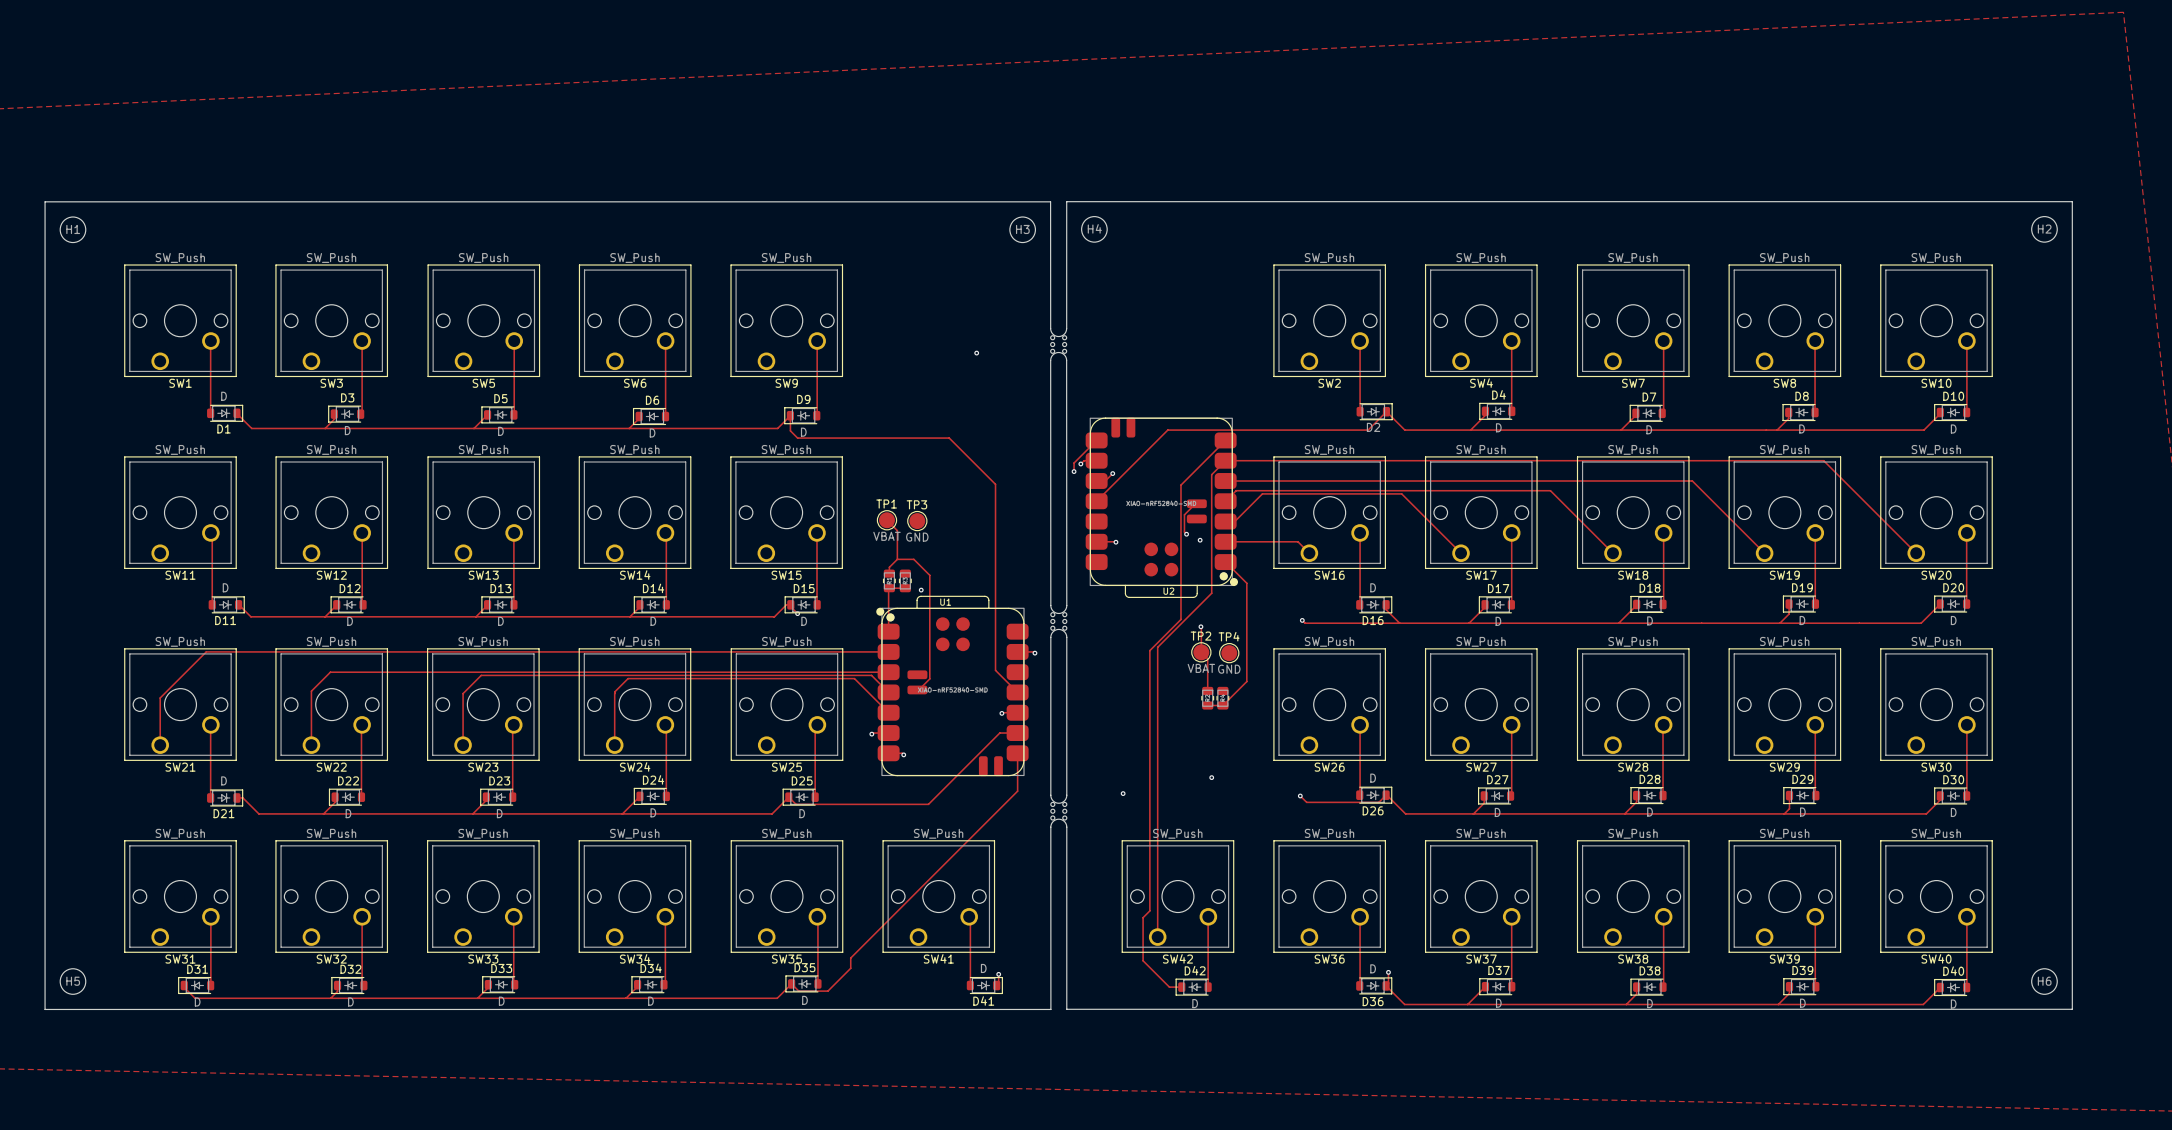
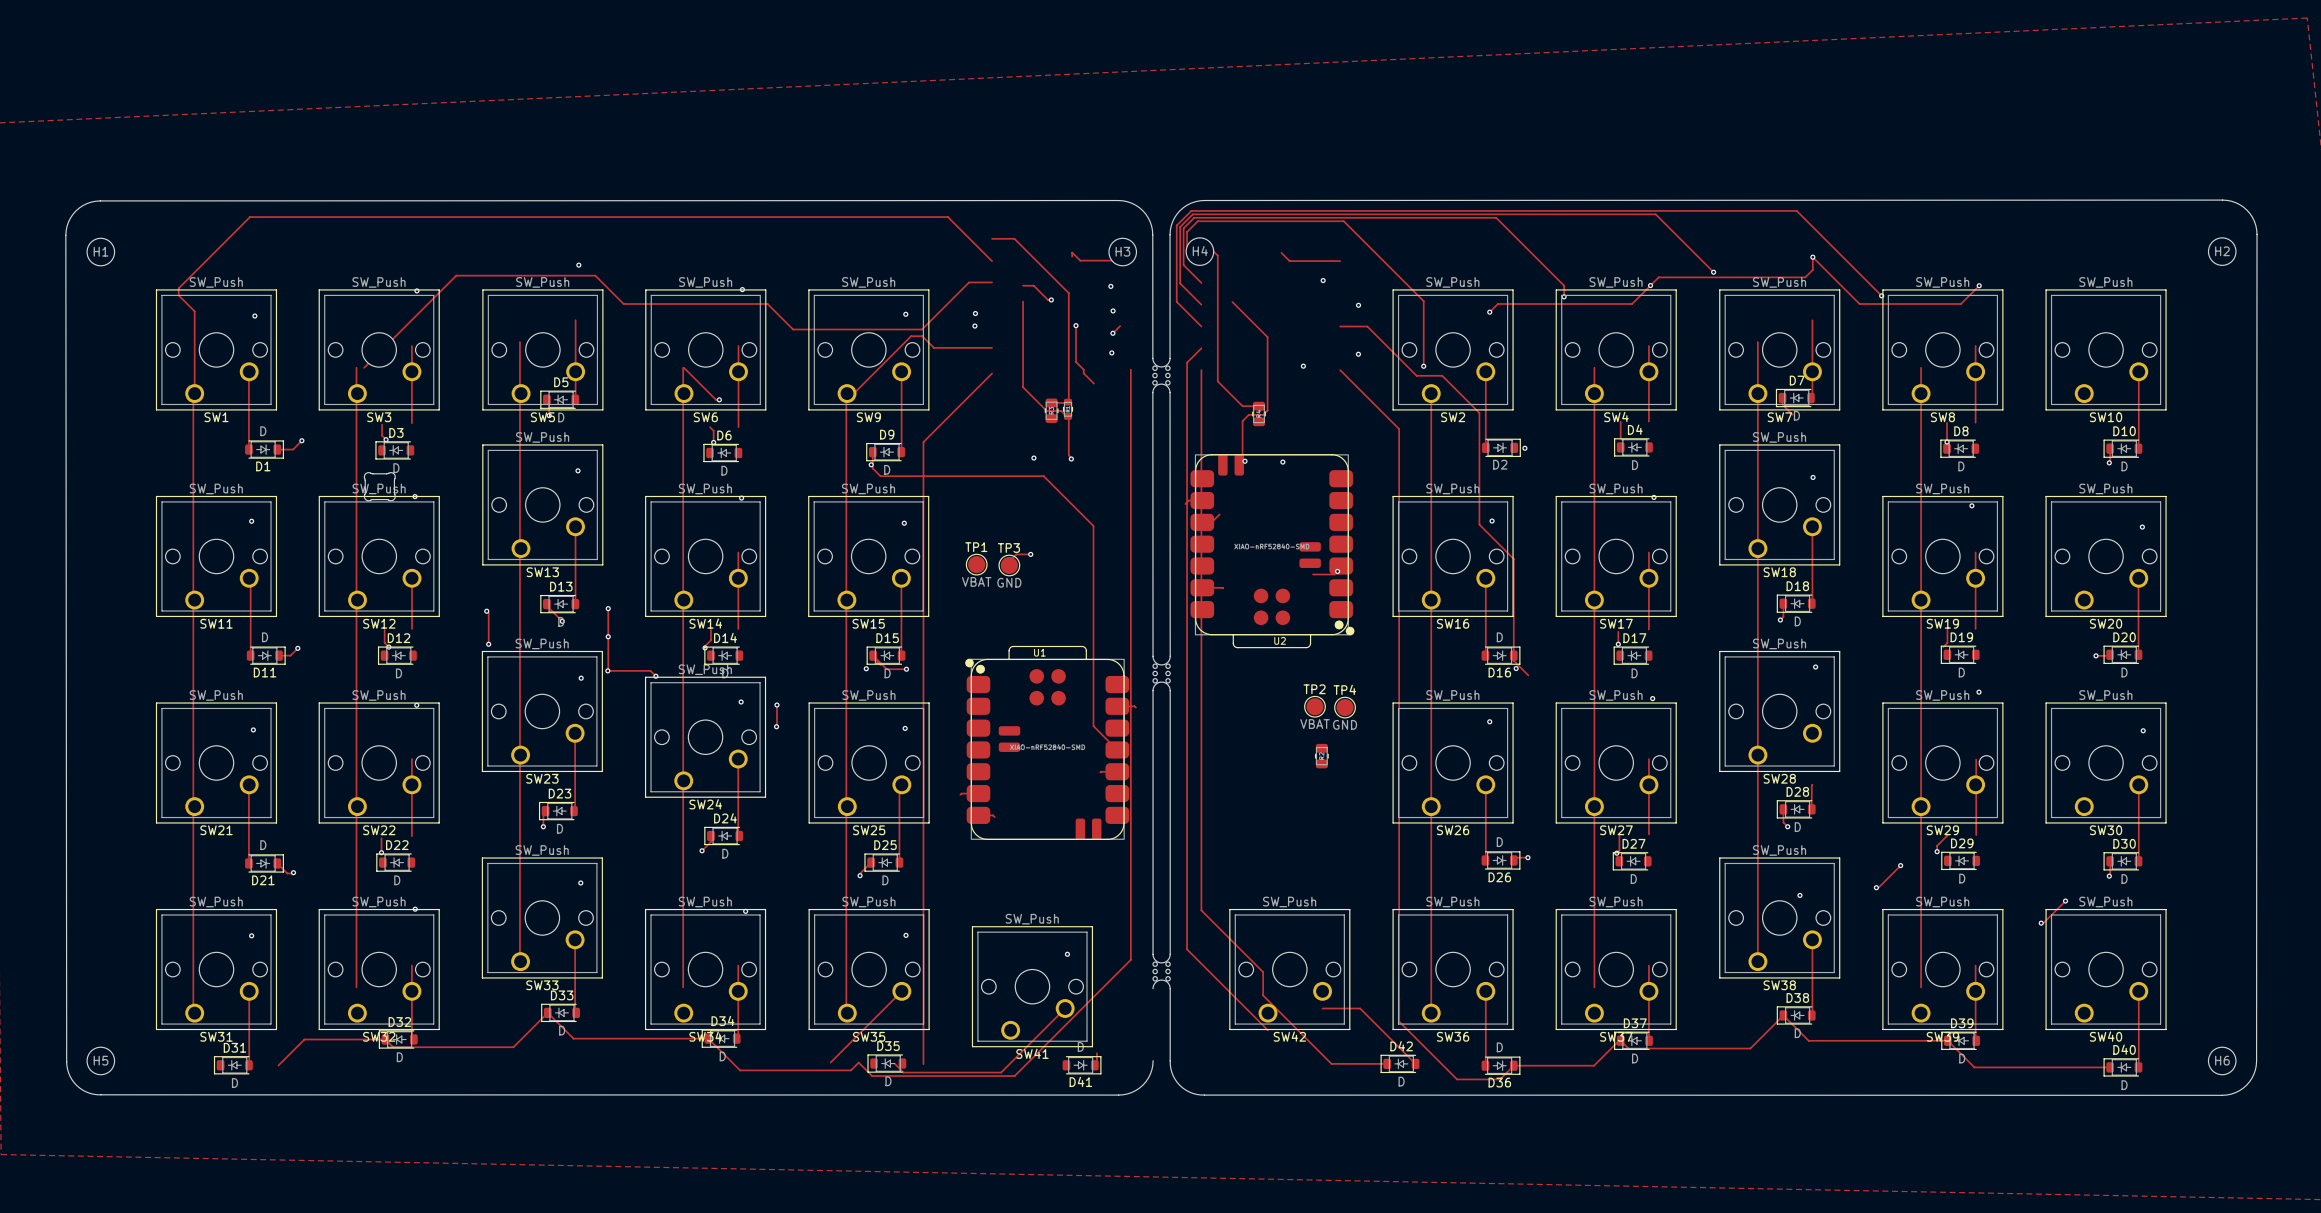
board edge: (1050, 213) (1050, 201) (45, 201) (45, 1009) (1050, 1009) (1050, 827) -> (1152, 234) (1150, 221) (1142, 210) (1131, 203) (1118, 200) (100, 200) (87, 203) (75, 211) (68, 222) (65, 235) (66, 1061) (70, 1076) (79, 1088) (89, 1093) (100, 1094) (1118, 1095)
track: none -> (992, 238) (1014, 238) (1068, 293) (1068, 402) (1051, 402)
track: none -> (1201, 239) (1217, 255) (1217, 381) (1242, 406)
track: none -> (1072, 252) (1080, 260) (1130, 260)
track: none -> (1072, 253) (1072, 256)
track: none -> (1281, 252) (1289, 261) (1340, 261)
via: none -> (1812, 257)
track: none -> (992, 261) (947, 217) (250, 217) (178, 288) (178, 295) (194, 311) (194, 393)
track: none -> (1201, 261) (1187, 246) (1187, 232) (1197, 221) (1343, 221) (1423, 301) (1423, 366)
via: none -> (578, 265)
track: none -> (1713, 272) (1655, 214) (1192, 214) (1180, 226) (1180, 283) (1201, 304)
via: none -> (1713, 272)
via: none -> (1323, 280)
track: none -> (992, 282) (969, 282) (922, 329) (793, 329) (767, 304) (623, 304) (595, 275) (456, 275) (364, 367)
track: none -> (1201, 282) (1183, 265) (1183, 228) (1194, 217) (1496, 217) (1564, 285) (1564, 296)
via: none -> (1650, 285)
track: none -> (1023, 285) (1033, 285) (1048, 299) (1051, 299)
via: none -> (1110, 286)
track: none -> (1979, 285) (1960, 304) (1859, 304) (1812, 257) (1812, 269) (1805, 277) (1658, 277) (1632, 304) (1497, 304) (1489, 312)
via: none -> (1979, 285)
via: none -> (742, 289)
via: none -> (416, 290)
track: none -> (1881, 295) (1796, 210) (1191, 210) (1176, 225) (1176, 301) (1201, 326)
via: none -> (1881, 295)
via: none -> (1564, 296)
via: none -> (1051, 299)
track: none -> (1023, 301) (1023, 387) (1046, 410) (1061, 410) (1068, 418) (1068, 455) (1071, 459)
track: none -> (1232, 302) (1267, 337) (1267, 410) (1263, 414) (1248, 414) (1242, 421) (1242, 458) (1244, 461)
via: none -> (1358, 305)
via: none -> (1113, 310)
via: none -> (1489, 312)
via: none -> (975, 313)
via: none -> (905, 314)
via: none -> (254, 316)
track: none -> (575, 320) (575, 371)
track: none -> (1812, 320) (1812, 371)
via: none -> (974, 326)
track: none -> (1075, 325) (1075, 361) (1093, 383)
via: none -> (1075, 325)
track: none -> (1120, 326) (1112, 333)
track: none -> (1340, 326) (1367, 326) (1416, 375) (1442, 375) (1479, 412) (1479, 524) (1513, 558) (1513, 655)
via: none -> (1112, 333)
track: none -> (519, 342) (519, 961)
track: none -> (1757, 342) (1757, 961)
track: none -> (411, 345) (411, 371)
track: none -> (1975, 345) (1975, 422)
track: none -> (992, 347) (933, 347) (922, 336) (911, 336) (853, 393)
track: none -> (1201, 348) (1187, 362) (1187, 949) (1268, 1030)
via: none -> (1111, 352)
via: none -> (1358, 354)
board edge: (1066, 328) (1066, 201) (2072, 201) (2072, 1009) (1066, 1009) (1066, 882) -> (1170, 358) (1170, 230) (1174, 217) (1180, 210) (1187, 205) (1199, 200) (2222, 200) (2235, 202) (2246, 210) (2252, 217) (2256, 229) (2256, 1060) (2251, 1078) (2243, 1088) (2235, 1092) (2222, 1095) (1200, 1094) (1182, 1087) (1171, 1072) (1170, 988)
via: none -> (1303, 366)
via: none -> (1423, 366)
track: none -> (356, 367) (356, 987)
track: none -> (683, 367) (683, 987)
track: none -> (683, 367) (716, 399) (719, 399)
track: none -> (1594, 367) (1594, 987)
track: none -> (1921, 367) (1921, 987)
track: none -> (1130, 369) (1130, 959) (1014, 1076) (872, 1076) (858, 1062) (850, 1070) (740, 1070) (708, 1038) (573, 1038) (547, 1012) (513, 1047) (393, 1047) (385, 1039) (304, 1039) (278, 1065)
track: none -> (1201, 370) (1201, 910) (1263, 972) (1263, 995) (1331, 1063) (1387, 1063)
track: none -> (1340, 370) (1399, 429) (1399, 998)
track: (1815, 341) (1815, 412) -> none
track: none -> (992, 373) (923, 442) (923, 1064)
via: (976, 353) -> none
track: none -> (193, 393) (193, 1013)
track: none -> (846, 393) (846, 1013)
track: none -> (1431, 393) (1431, 1013)
track: (1663, 364) (1662, 413) -> none
track: none -> (1782, 398) (1782, 404) (1792, 414)
track: (514, 366) (513, 414) -> none
via: none -> (719, 399)
track: none -> (549, 402) (549, 415)
track: none -> (1243, 406) (1258, 406)
via: none -> (549, 415)
track: none -> (1620, 421) (1620, 438) (1622, 440)
track: (1511, 387) (1511, 411) -> (1648, 345) (1648, 371)
track: (362, 388) (360, 414) -> none
track: none -> (1947, 422) (1947, 442)
track: none -> (382, 424) (382, 435) (386, 439)
track: none -> (710, 427) (713, 430) (713, 442)
track: (665, 392) (665, 416) -> (738, 345) (738, 371)
via: none -> (386, 439)
via: none -> (301, 440)
via: none -> (713, 442)
via: none -> (1947, 442)
track: (1485, 411) (1485, 415) (1470, 430) -> none
via: none -> (1524, 448)
track: (1788, 412) (1788, 418) (1777, 430) -> none
track: (236, 413) (251, 428) (777, 428) (790, 415) -> (277, 449) (293, 449) (301, 440)
track: (333, 413) (334, 419) (325, 428) -> none
track: (1635, 413) (1621, 430) -> none
D7 position: (1647, 413) -> (1795, 398)
track: (1940, 413) (1923, 430) (1404, 430) (1386, 411) (1368, 430) (1167, 430) (1096, 501) -> (2110, 449) (2109, 462)
track: (487, 414) (474, 428) -> none
D5 position: (499, 414) -> (559, 399)
track: (639, 416) (629, 428) -> none
via: none -> (1033, 458)
via: none -> (1071, 459)
via: none -> (1244, 461)
via: none -> (1282, 462)
via: none -> (2109, 462)
via: none -> (871, 464)
via: none -> (577, 470)
via: none -> (1813, 477)
track: (1096, 440) (1074, 463) (1074, 471) -> none
track: (1225, 440) (1180, 485) (1180, 619) (1149, 650) (1149, 910) (1143, 917) (1143, 960) (1169, 987) (1181, 987) -> none
part: none -> (379, 486)
via: none -> (415, 496)
via: none -> (1653, 497)
via: none -> (741, 498)
via: (1080, 463) -> none
via: none -> (1971, 505)
via: (1074, 471) -> none
via: (1112, 473) -> none
via: none -> (251, 521)
via: none -> (1492, 521)
track: (1225, 480) (1692, 480) (1764, 553) -> none
via: none -> (904, 523)
track: none -> (575, 526) (575, 603)
track: none -> (1812, 526) (1812, 578)
via: none -> (2142, 527)
track: (1225, 501) (1236, 490) (1550, 490) (1612, 553) -> none
track: (1196, 503) (1184, 514) (1184, 532) (1186, 534) -> none
track: none -> (738, 552) (738, 628)
track: none -> (1648, 552) (1648, 578)
track: none -> (1975, 552) (1975, 578)
track: none -> (1030, 554) (1016, 554) (1002, 568)
via: none -> (1030, 554)
SW13 position: (483, 512) -> (542, 504)
SW18 position: (1633, 512) -> (1779, 504)
track: (886, 520) (897, 530) (897, 559) -> none
track: (1225, 521) (1234, 521) (1262, 493) (1401, 493) (1461, 553) -> none
track: none -> (1337, 571) (1334, 574) (1313, 574)
via: none -> (1337, 571)
track: (514, 532) (513, 604) -> none
track: (665, 532) (666, 604) -> none
via: (1186, 534) -> none
via: (1200, 540) -> none
track: (1225, 541) (1297, 541) (1309, 553) -> none
via: (1115, 542) -> none
track: (1916, 553) (1823, 460) (1225, 460) (1211, 474) (1211, 593) (1157, 647) (1157, 937) -> none
track: (1663, 554) (1663, 604) -> none
track: none -> (1783, 603) (1783, 617) (1780, 620)
track: none -> (546, 605) (562, 621)
track: (897, 559) (889, 567) (889, 573) -> none
track: (897, 559) (913, 559) (929, 575) (929, 678) (918, 689) (916, 689) -> none
track: none -> (608, 608) (607, 670) (650, 670) (655, 676)
via: none -> (608, 608)
track: (1225, 562) (1246, 583) (1246, 681) (1222, 705) (1207, 705) -> none
track: none -> (486, 611) (488, 613) (488, 644)
via: none -> (486, 611)
part footprint: [883, 569, 896, 593] -> [1063, 398, 1074, 420]
via: none -> (1780, 620)
via: none -> (562, 621)
track: (1815, 579) (1815, 604) -> none
track: none -> (384, 629) (384, 642) (388, 647)
track: (362, 580) (363, 604) -> none
track: none -> (710, 629) (710, 640) (705, 647)
part position: (905, 580) -> (1051, 410)
track: (1511, 580) (1511, 604) -> none
track: none -> (1947, 629) (1947, 642) (1943, 647)
track: none -> (1618, 631) (1618, 644)
via: none -> (608, 636)
track: (905, 588) (888, 588) (888, 631) -> none
via: (921, 590) -> none
via: none -> (488, 644)
via: none -> (1618, 644)
via: none -> (388, 647)
via: none -> (705, 647)
via: none -> (297, 648)
track: (238, 604) (250, 616) (774, 616) (786, 604) (790, 604) -> (279, 655) (290, 655) (297, 648)
track: (336, 604) (325, 616) -> none
track: (487, 604) (475, 616) -> none
D13 position: (499, 604) -> (559, 604)
track: (639, 604) (630, 616) -> none
track: none -> (873, 655) (886, 669) (906, 669)
track: (1485, 604) (1485, 607) (1469, 623) -> none
track: (1636, 604) (1618, 623) -> none
D18 position: (1648, 604) -> (1796, 603)
track: (1789, 604) (1789, 614) (1779, 623) -> none
track: (1940, 604) (1921, 623) (1305, 623) (1302, 620) -> none
track: none -> (2096, 655) (2109, 655)
via: none -> (2096, 655)
via: (797, 613) -> none
via: none -> (1815, 667)
via: none -> (1516, 668)
via: none -> (866, 668)
via: none -> (906, 669)
via: none -> (607, 670)
via: (1302, 620) -> none
via: none -> (655, 676)
via: none -> (581, 678)
track: (1200, 626) (1201, 652) (1207, 658) (1207, 690) -> none
via: (1200, 626) -> none
via: none -> (1979, 692)
via: none -> (1652, 698)
via: none -> (741, 702)
via: none -> (416, 705)
track: none -> (776, 705) (776, 726)
via: none -> (776, 705)
track: (888, 651) (206, 651) (160, 697) (160, 745) -> none
via: (1034, 653) -> none
via: none -> (1489, 721)
via: none -> (776, 726)
via: none -> (905, 728)
track: (888, 672) (330, 672) (311, 691) (311, 745) (317, 745) -> none
via: none -> (253, 729)
via: none -> (2143, 730)
track: none -> (575, 733) (575, 809)
track: (888, 692) (871, 675) (481, 675) (463, 693) (463, 745) -> none
part position: (1222, 698) -> (1258, 413)
track: none -> (411, 759) (411, 836)
track: none -> (738, 759) (738, 834)
track: none -> (1648, 759) (1648, 784)
track: none -> (1976, 759) (1976, 835)
SW23 position: (483, 704) -> (542, 711)
SW24 position: (634, 704) -> (705, 737)
SW28 position: (1633, 704) -> (1779, 711)
track: (888, 712) (854, 678) (628, 678) (614, 691) (614, 745) -> none
via: (1001, 713) -> none
track: (362, 724) (361, 797) -> none
track: (513, 724) (512, 797) -> none
track: (665, 724) (666, 796) -> none
track: (1815, 724) (1815, 795) -> none
track: (1017, 733) (999, 733) (928, 804) (796, 804) (788, 797) -> none
via: (871, 734) -> none
track: none -> (1783, 809) (1783, 822) (1787, 826)
track: (1663, 747) (1663, 795) -> (1812, 939) (1812, 991)
track: none -> (543, 813) (543, 826)
track: (1017, 753) (1017, 791) (850, 958) (850, 968) (827, 991) (798, 991) (791, 983) (777, 998) (195, 998) (184, 985) -> none
via: (903, 754) -> none
via: none -> (543, 826)
via: none -> (1787, 826)
track: (1511, 770) (1510, 795) -> none
track: none -> (1947, 835) (1937, 845) (1937, 851)
track: none -> (710, 835) (710, 841) (702, 850)
track: none -> (1619, 835) (1619, 850) (1616, 853)
track: none -> (381, 838) (381, 852)
via: (1211, 777) -> none
via: none -> (702, 850)
via: none -> (1937, 851)
via: none -> (381, 852)
via: none -> (1616, 853)
track: none -> (1516, 857) (1527, 857)
via: none -> (1527, 857)
via: (1123, 793) -> none
board edge: none -> (1153, 860) (1153, 954)
board edge: none -> (1170, 860) (1170, 894)
track: (1300, 795) (1306, 802) (1378, 802) (1386, 795) (1405, 813) (1926, 813) (1940, 799) -> (2109, 876) (2110, 865)
via: (1300, 795) -> none
track: (1484, 795) (1484, 803) (1473, 813) -> none
track: (1636, 795) (1636, 801) (1624, 813) -> none
D28 position: (1648, 795) -> (1796, 809)
track: (1789, 795) (1789, 808) (1784, 813) -> none
track: (639, 796) (622, 813) -> none
D24 position: (651, 796) -> (723, 835)
track: (236, 797) (242, 797) (258, 813) (772, 813) (778, 807) -> (277, 863) (287, 873) (293, 872)
track: (335, 797) (335, 802) (323, 813) -> none
track: (486, 797) (486, 800) (472, 813) -> none
D23 position: (498, 797) -> (558, 811)
track: none -> (1900, 865) (1878, 887)
via: none -> (1900, 865)
via: none -> (293, 872)
via: none -> (860, 875)
via: none -> (2109, 876)
part position: (1058, 811) -> (1161, 971)
via: none -> (580, 883)
via: none -> (1876, 887)
via: none -> (1799, 895)
track: none -> (2065, 901) (2041, 923)
via: none -> (2065, 901)
via: none -> (415, 909)
via: none -> (745, 911)
via: none -> (2041, 923)
via: none -> (906, 935)
via: none -> (251, 935)
track: none -> (575, 939) (575, 991)
via: none -> (1067, 954)
track: none -> (411, 965) (411, 991)
track: none -> (738, 965) (738, 991)
track: none -> (1975, 965) (1975, 991)
SW33 position: (483, 896) -> (542, 917)
SW41 position: (938, 896) -> (1032, 986)
SW38 position: (1633, 896) -> (1779, 917)
track: (817, 916) (817, 983) -> (901, 991) (830, 1062)
track: (969, 916) (970, 985) -> none
track: (1208, 916) (1208, 987) -> none
track: none -> (1399, 998) (1399, 1021) (1457, 1079) (1500, 1079) (1513, 1065) (1594, 1065) (1618, 1040)
track: none -> (1065, 1008) (1001, 1072) (903, 1072) (895, 1064)
track: none -> (1322, 1008) (1360, 1008) (1415, 1063)
track: (513, 935) (514, 984) -> none
track: (1663, 938) (1663, 987) -> none
track: (362, 959) (362, 983) (363, 985) -> none
track: (665, 959) (663, 984) -> none
track: (1511, 962) (1511, 986) -> (1648, 965) (1648, 991)
track: (1815, 962) (1815, 986) -> none
track: (1388, 972) (1388, 983) (1386, 985) (1404, 1004) (1923, 1004) (1940, 987) -> (1620, 1040) (1628, 1048) (1750, 1048) (1783, 1015) (1808, 1040) (1947, 1040) (1974, 1067) (2110, 1067)
via: (1388, 972) -> none
via: (998, 974) -> none
board edge: none -> (1153, 1060) (1150, 1073) (1143, 1085) (1131, 1092) (1118, 1095)
track: (488, 984) (488, 987) (477, 998) -> none
D33 position: (500, 984) -> (560, 1012)
track: (637, 984) (626, 998) -> none
D34 position: (649, 984) -> (721, 1038)
track: (337, 985) (337, 991) (330, 998) -> none
D32 position: (349, 985) -> (398, 1039)
track: (1485, 986) (1467, 1004) -> none
D37 position: (1497, 986) -> (1633, 1040)
track: (1789, 986) (1789, 993) (1778, 1004) -> none
D39 position: (1801, 986) -> (1960, 1040)
D42 position: (1193, 987) -> (1400, 1063)
track: (1636, 987) (1636, 994) (1626, 1004) -> none
D38 position: (1648, 987) -> (1796, 1015)

